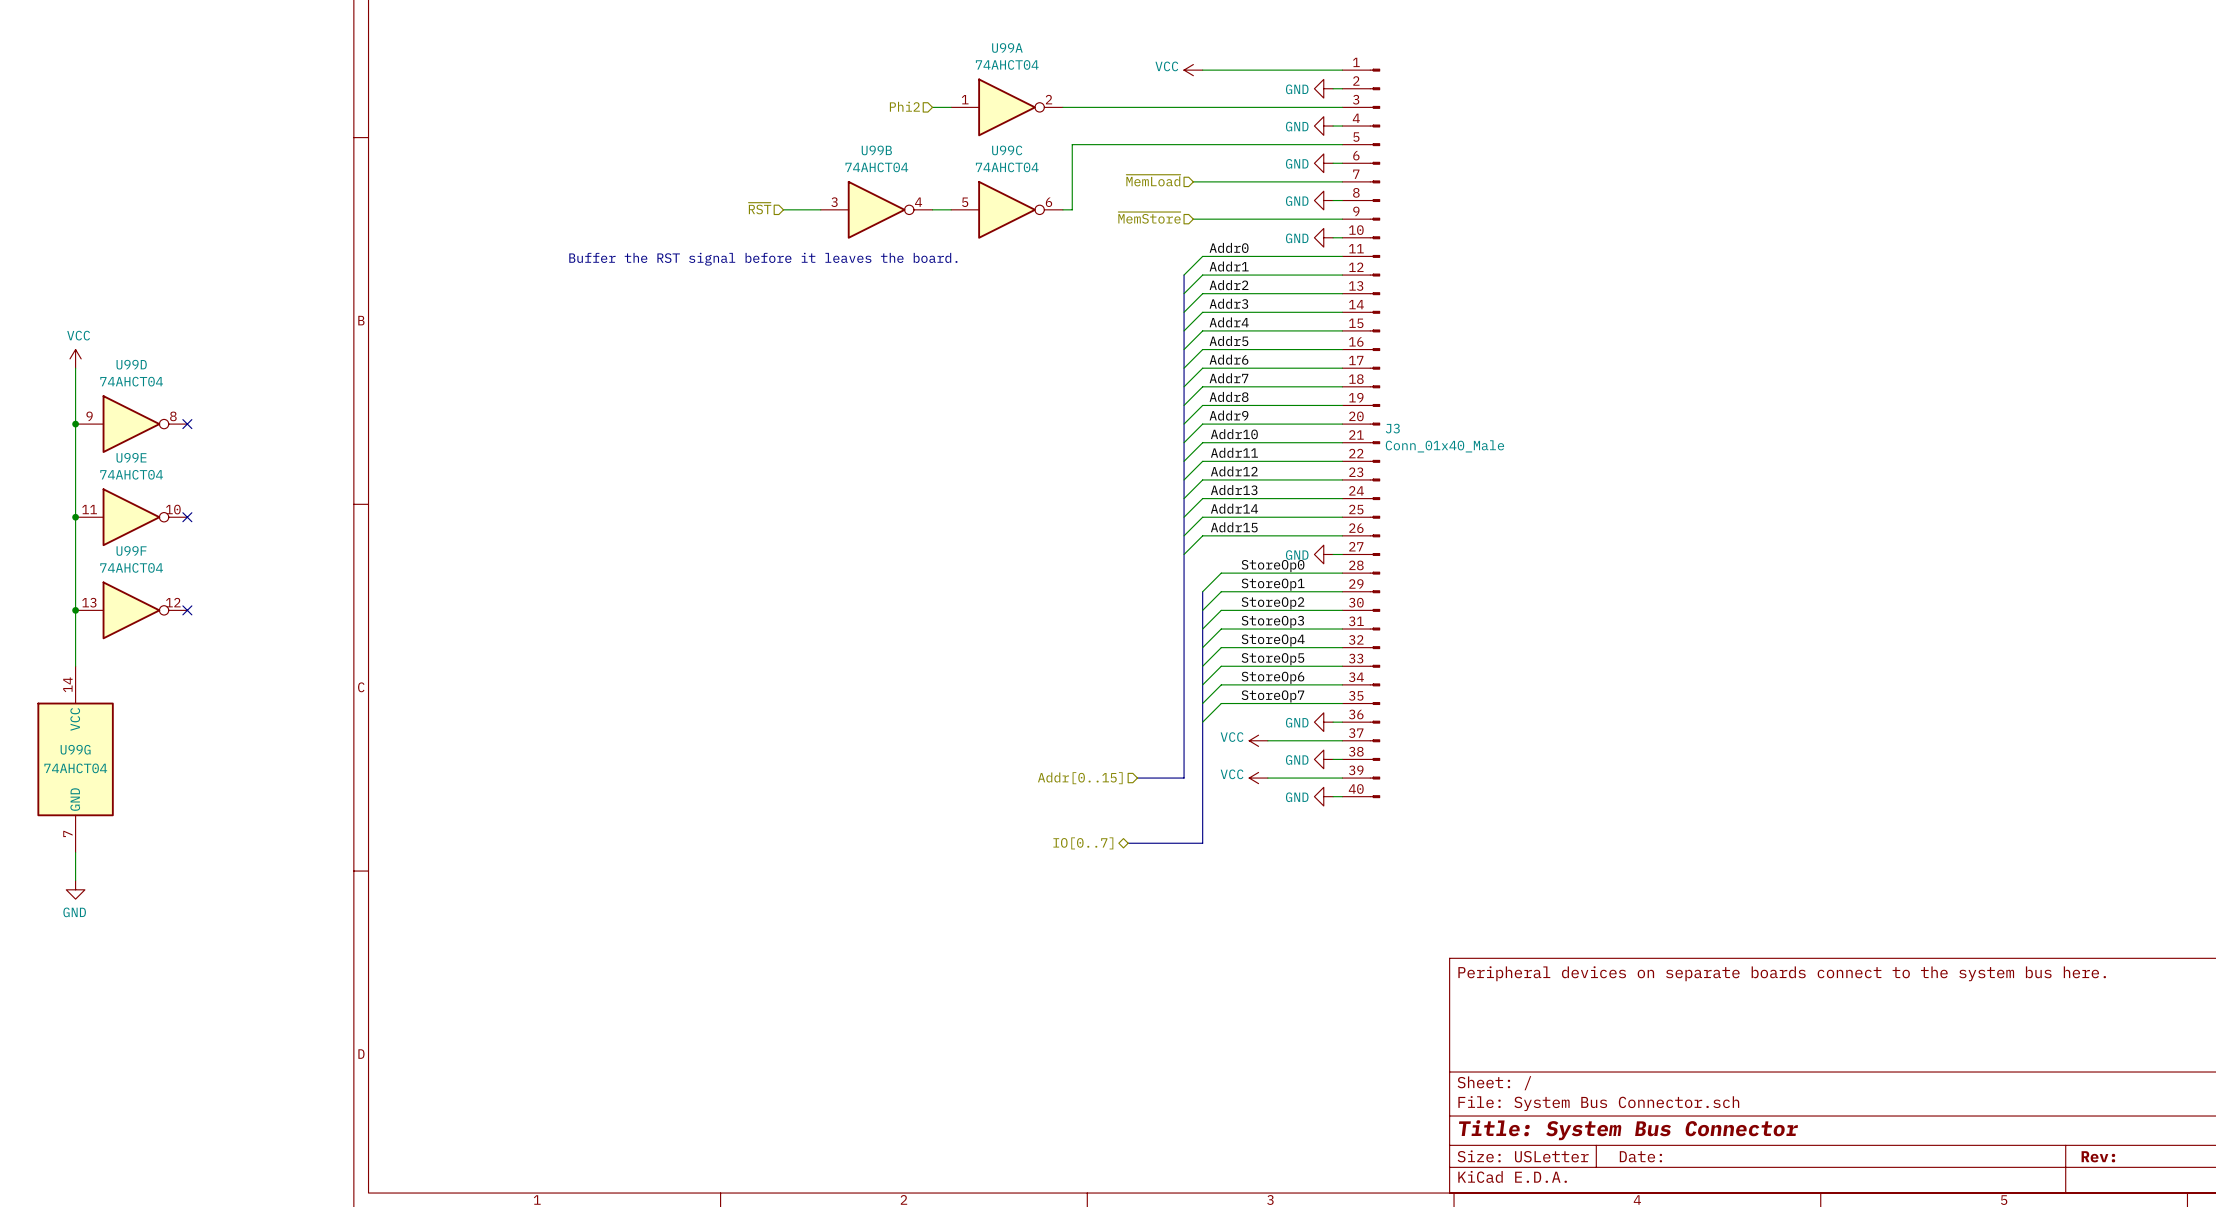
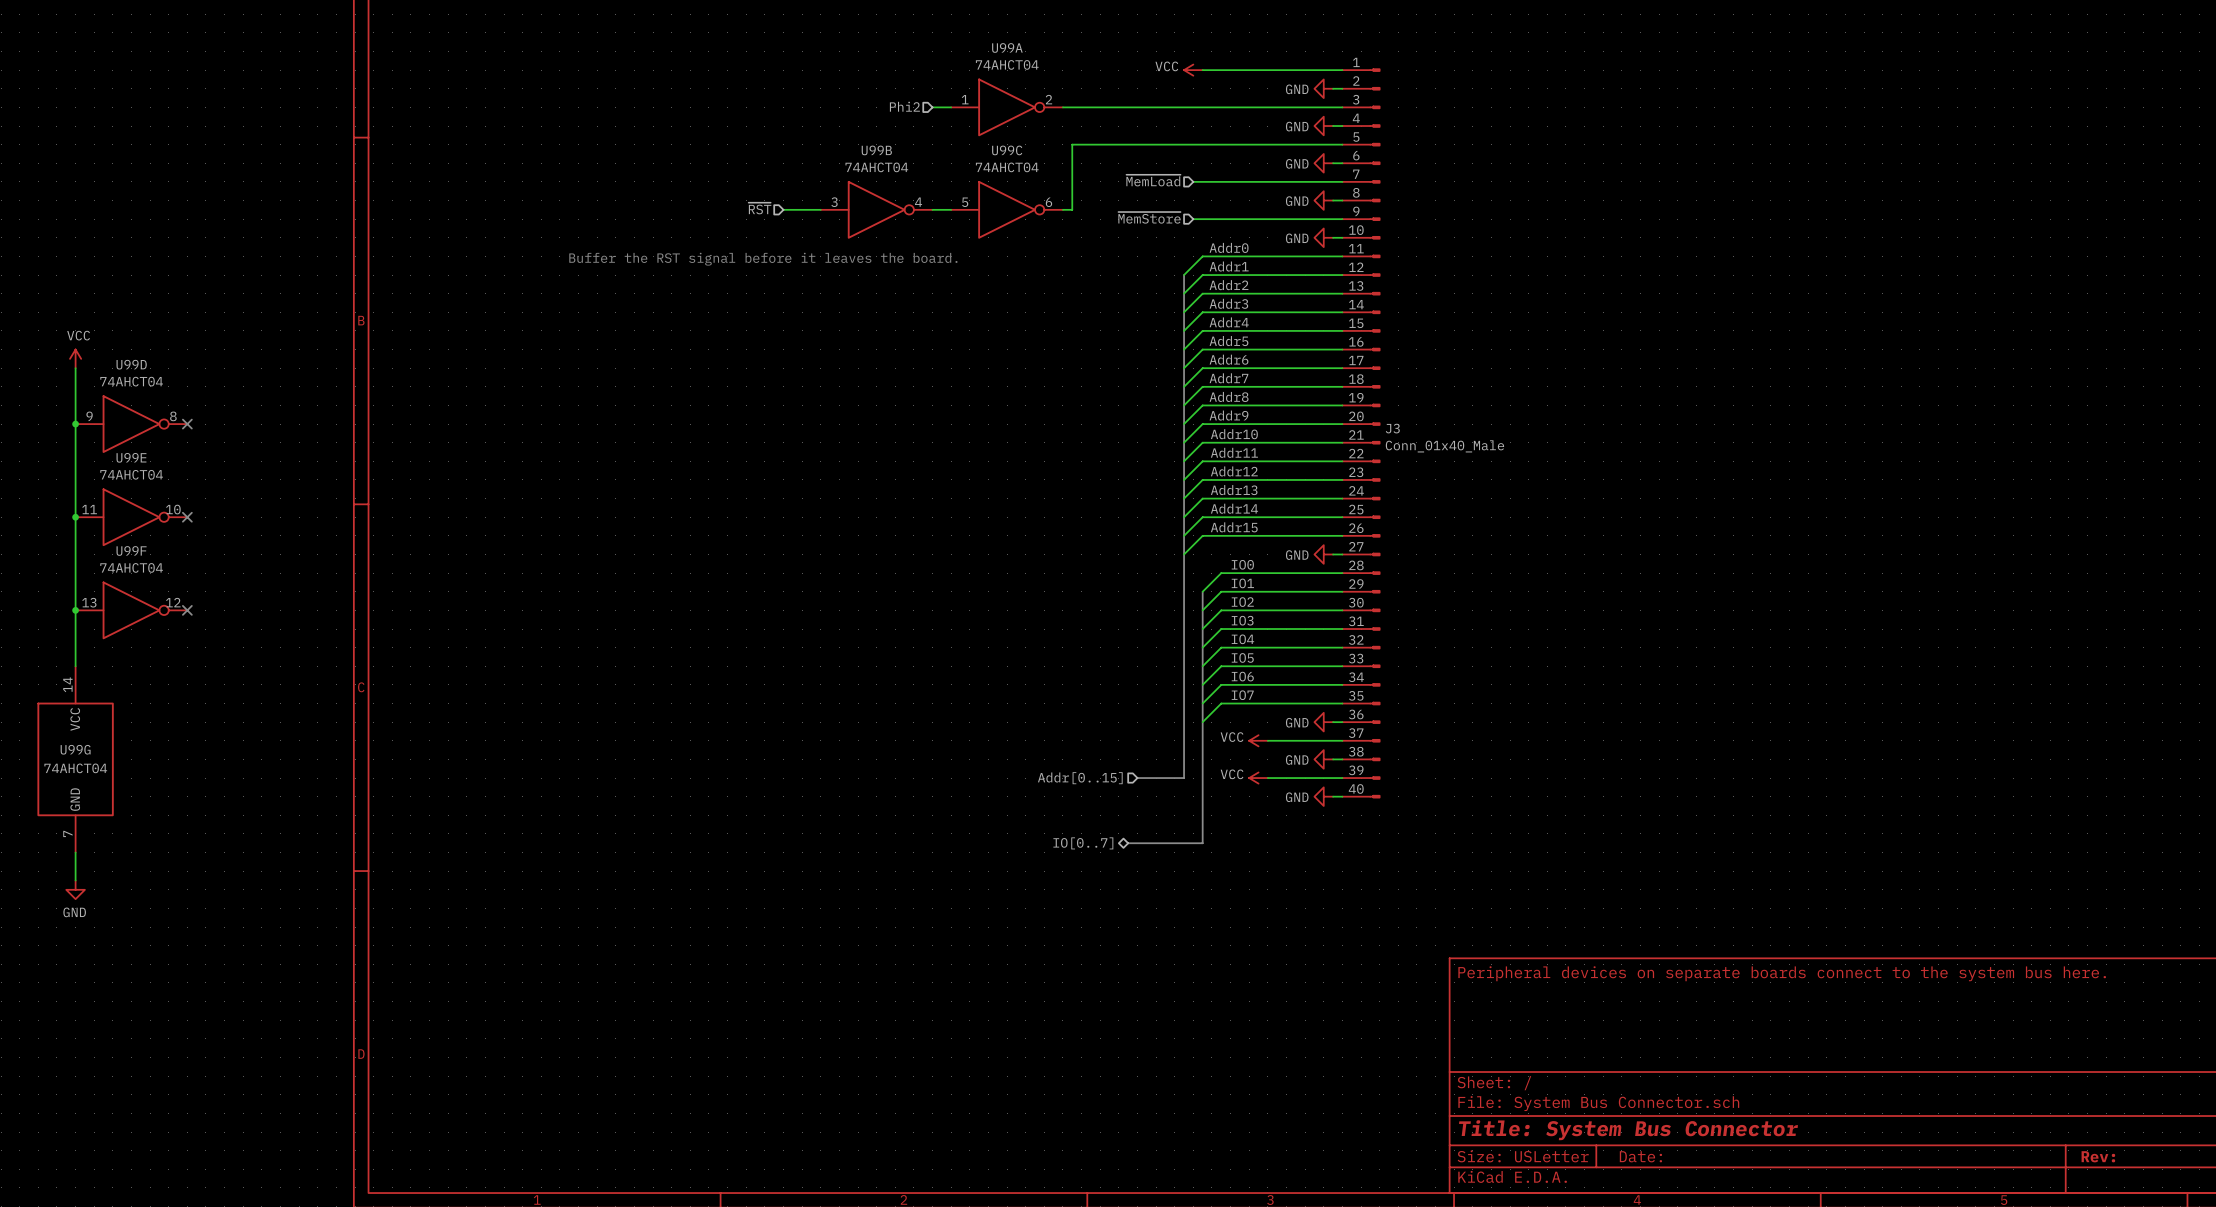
label: none -> IO0 (1242, 564)
label: StoreOp0 (1273, 566) -> none
label: none -> IO1 (1242, 583)
label: StoreOp1 (1273, 584) -> none
label: none -> IO2 (1242, 602)
label: StoreOp2 (1272, 603) -> none
label: none -> IO3 (1242, 620)
label: StoreOp3 (1272, 621) -> none
label: none -> IO4 (1242, 639)
label: StoreOp4 (1273, 640) -> none
label: none -> IO5 (1242, 657)
label: StoreOp5 (1272, 659) -> none
label: none -> IO6 (1242, 676)
label: StoreOp6 (1272, 677) -> none
label: none -> IO7 (1242, 695)
label: StoreOp7 (1272, 696) -> none

